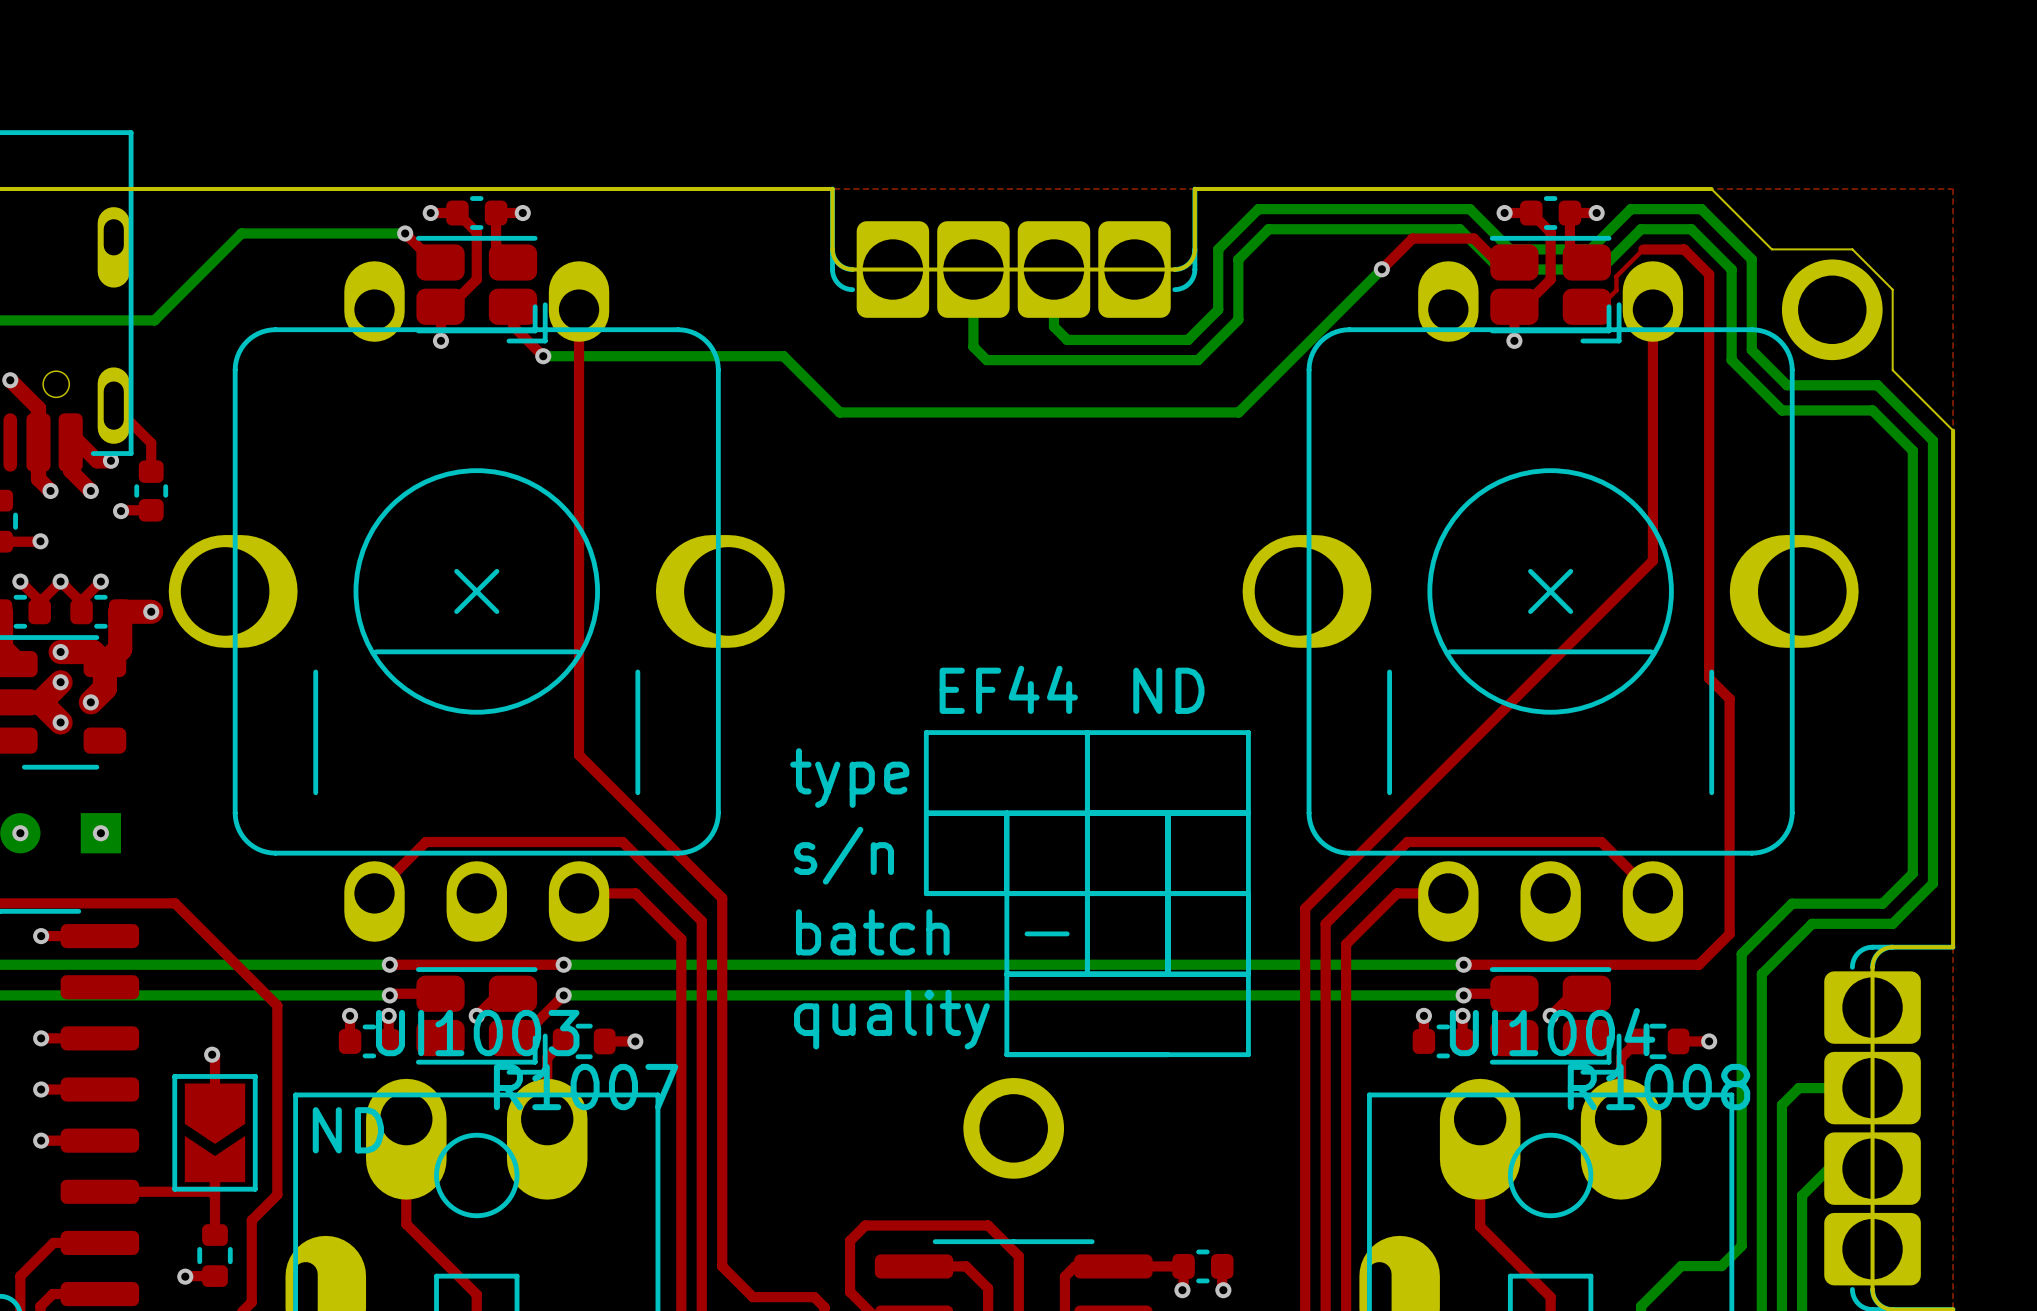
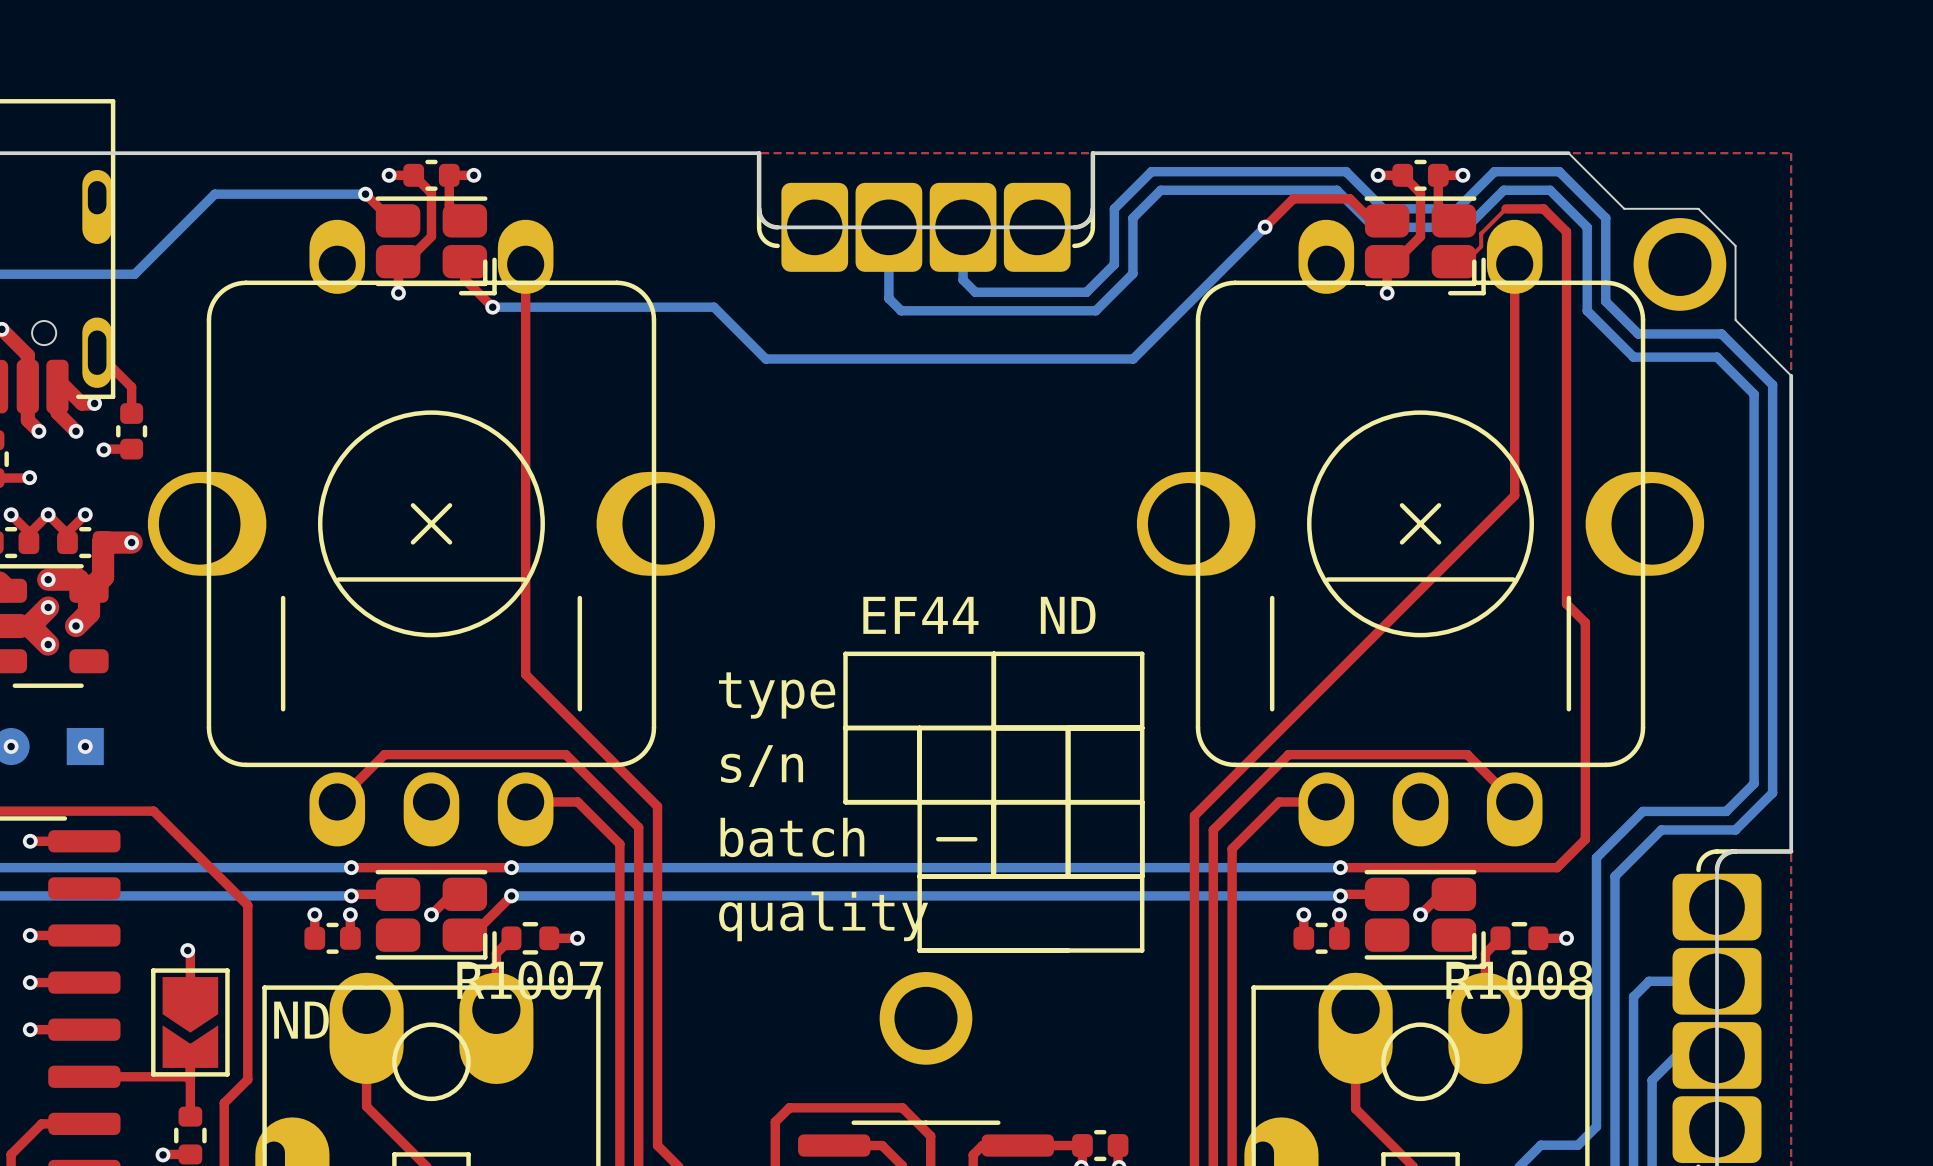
UI1004 name: UI1004 (1552, 1032) -> none
UI1003 name: UI1003 (477, 1033) -> none

